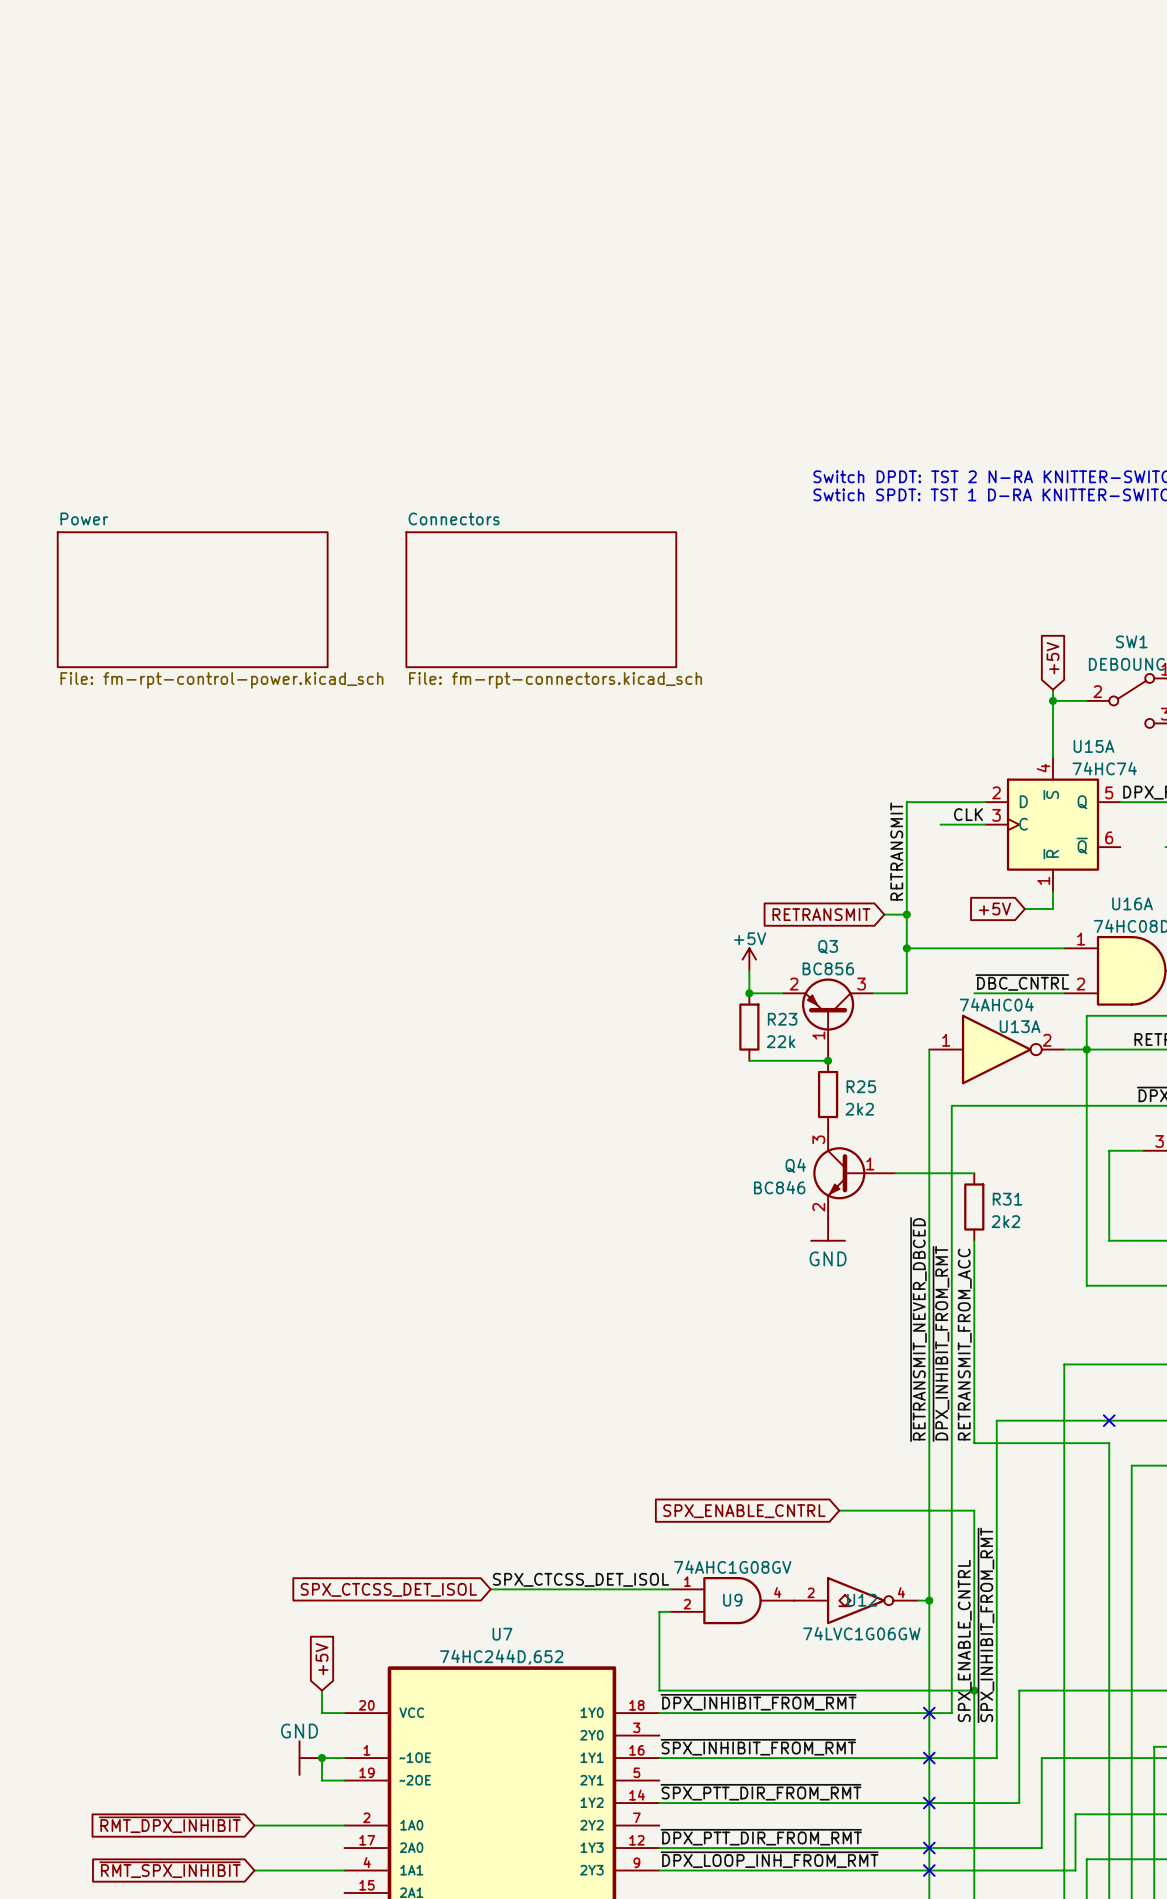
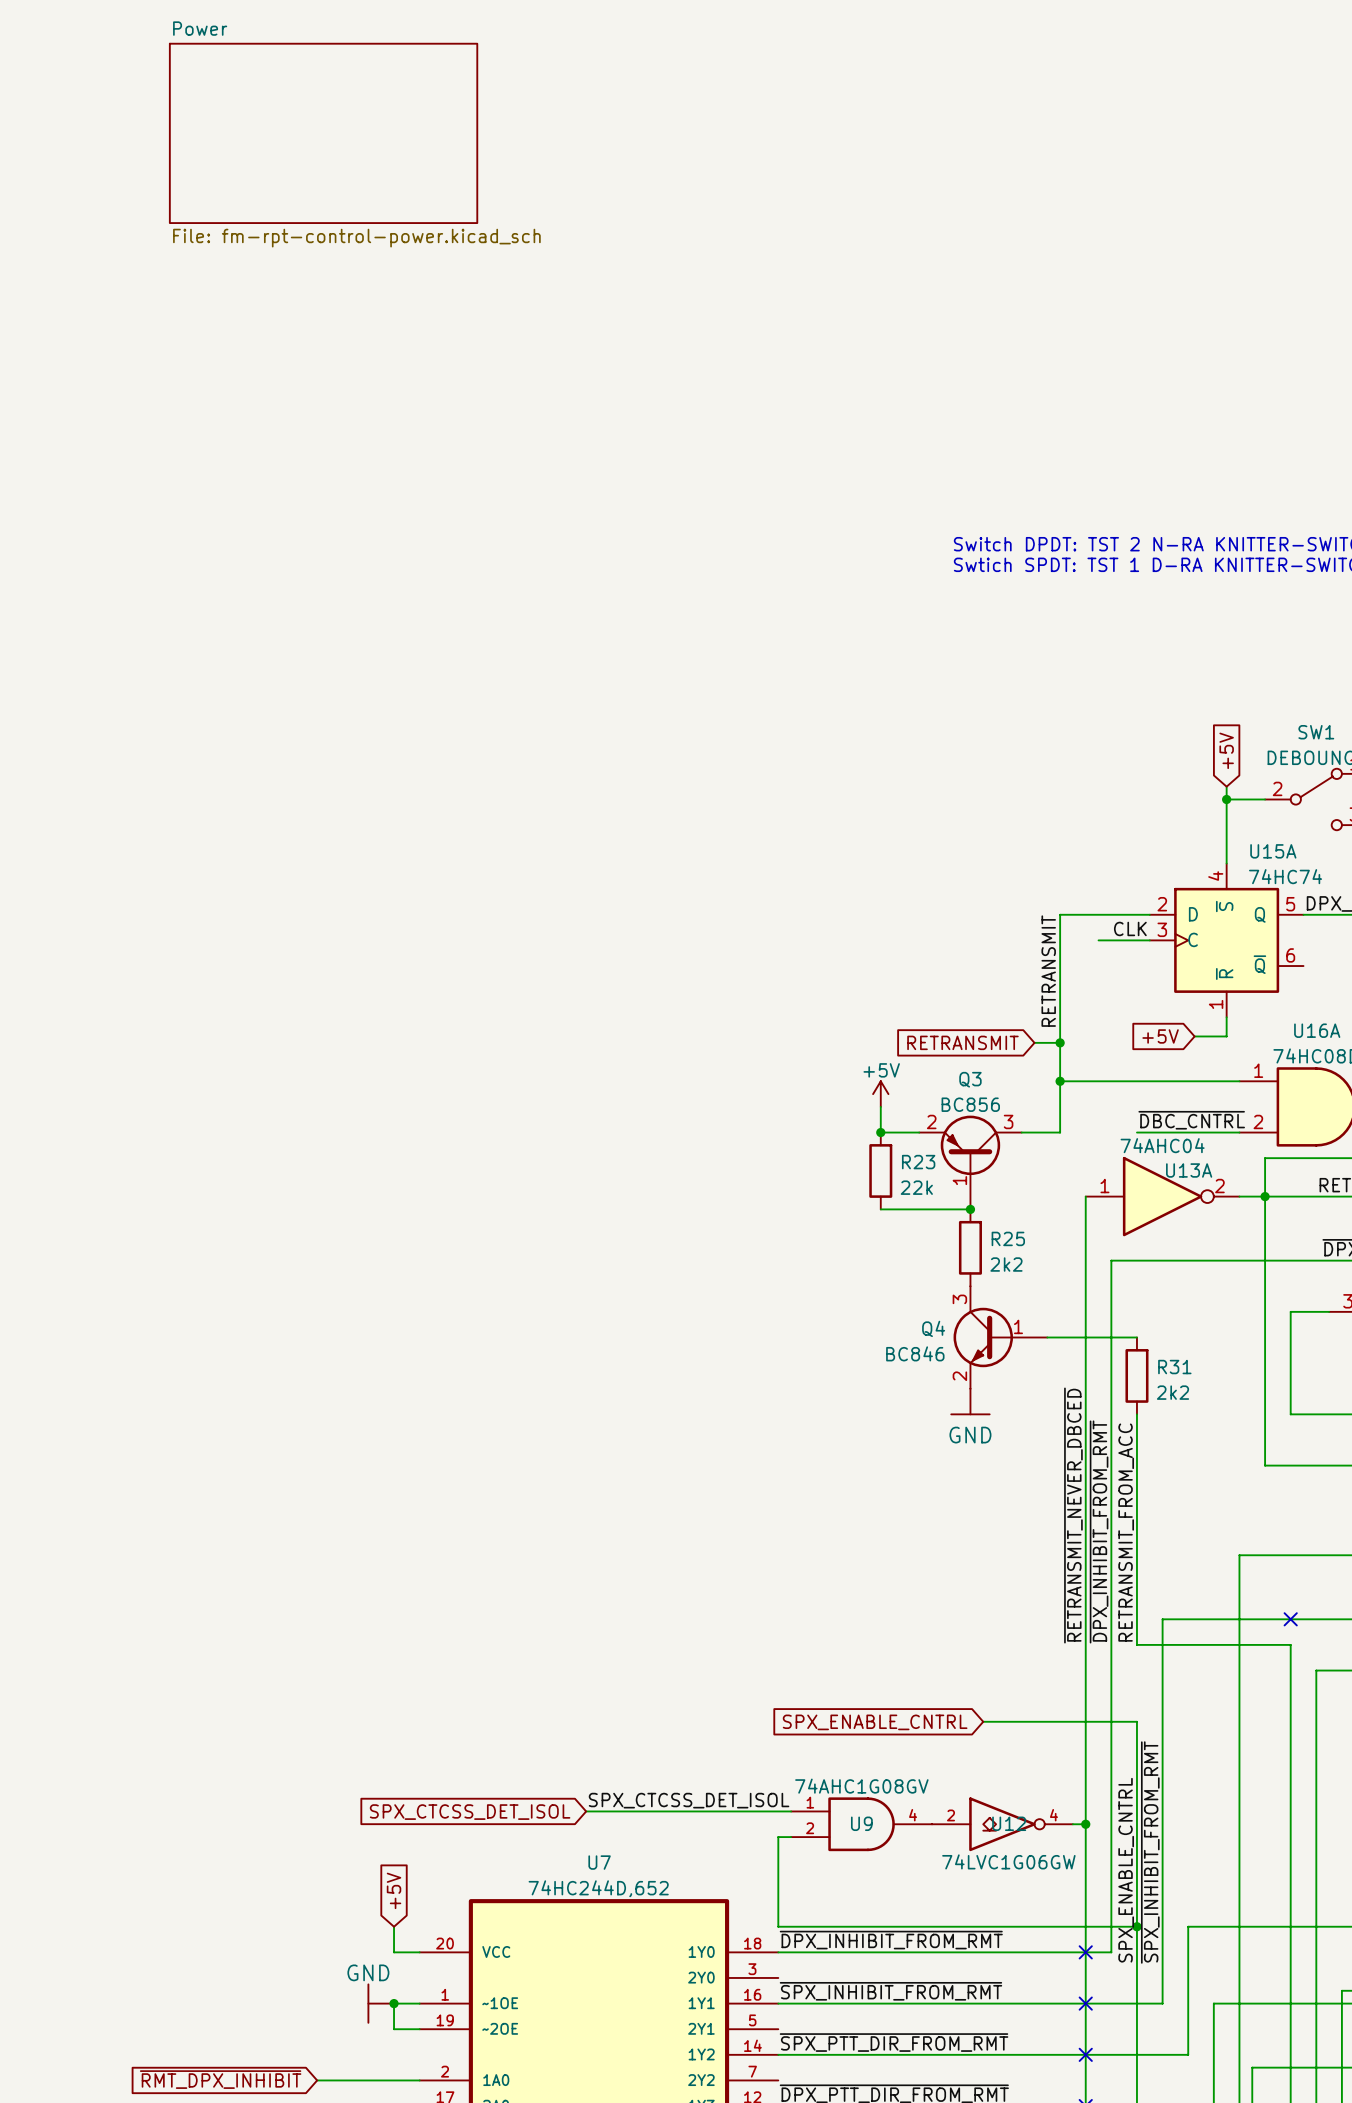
sheet Power: none -> File: fm-rpt-control-power.kicad_sch (323, 133)
sheet Power: File: fm-rpt-control-power.kicad_sch (192, 599) -> none
sheet Connectors: File: fm-rpt-connectors.kicad_sch (541, 599) -> none

